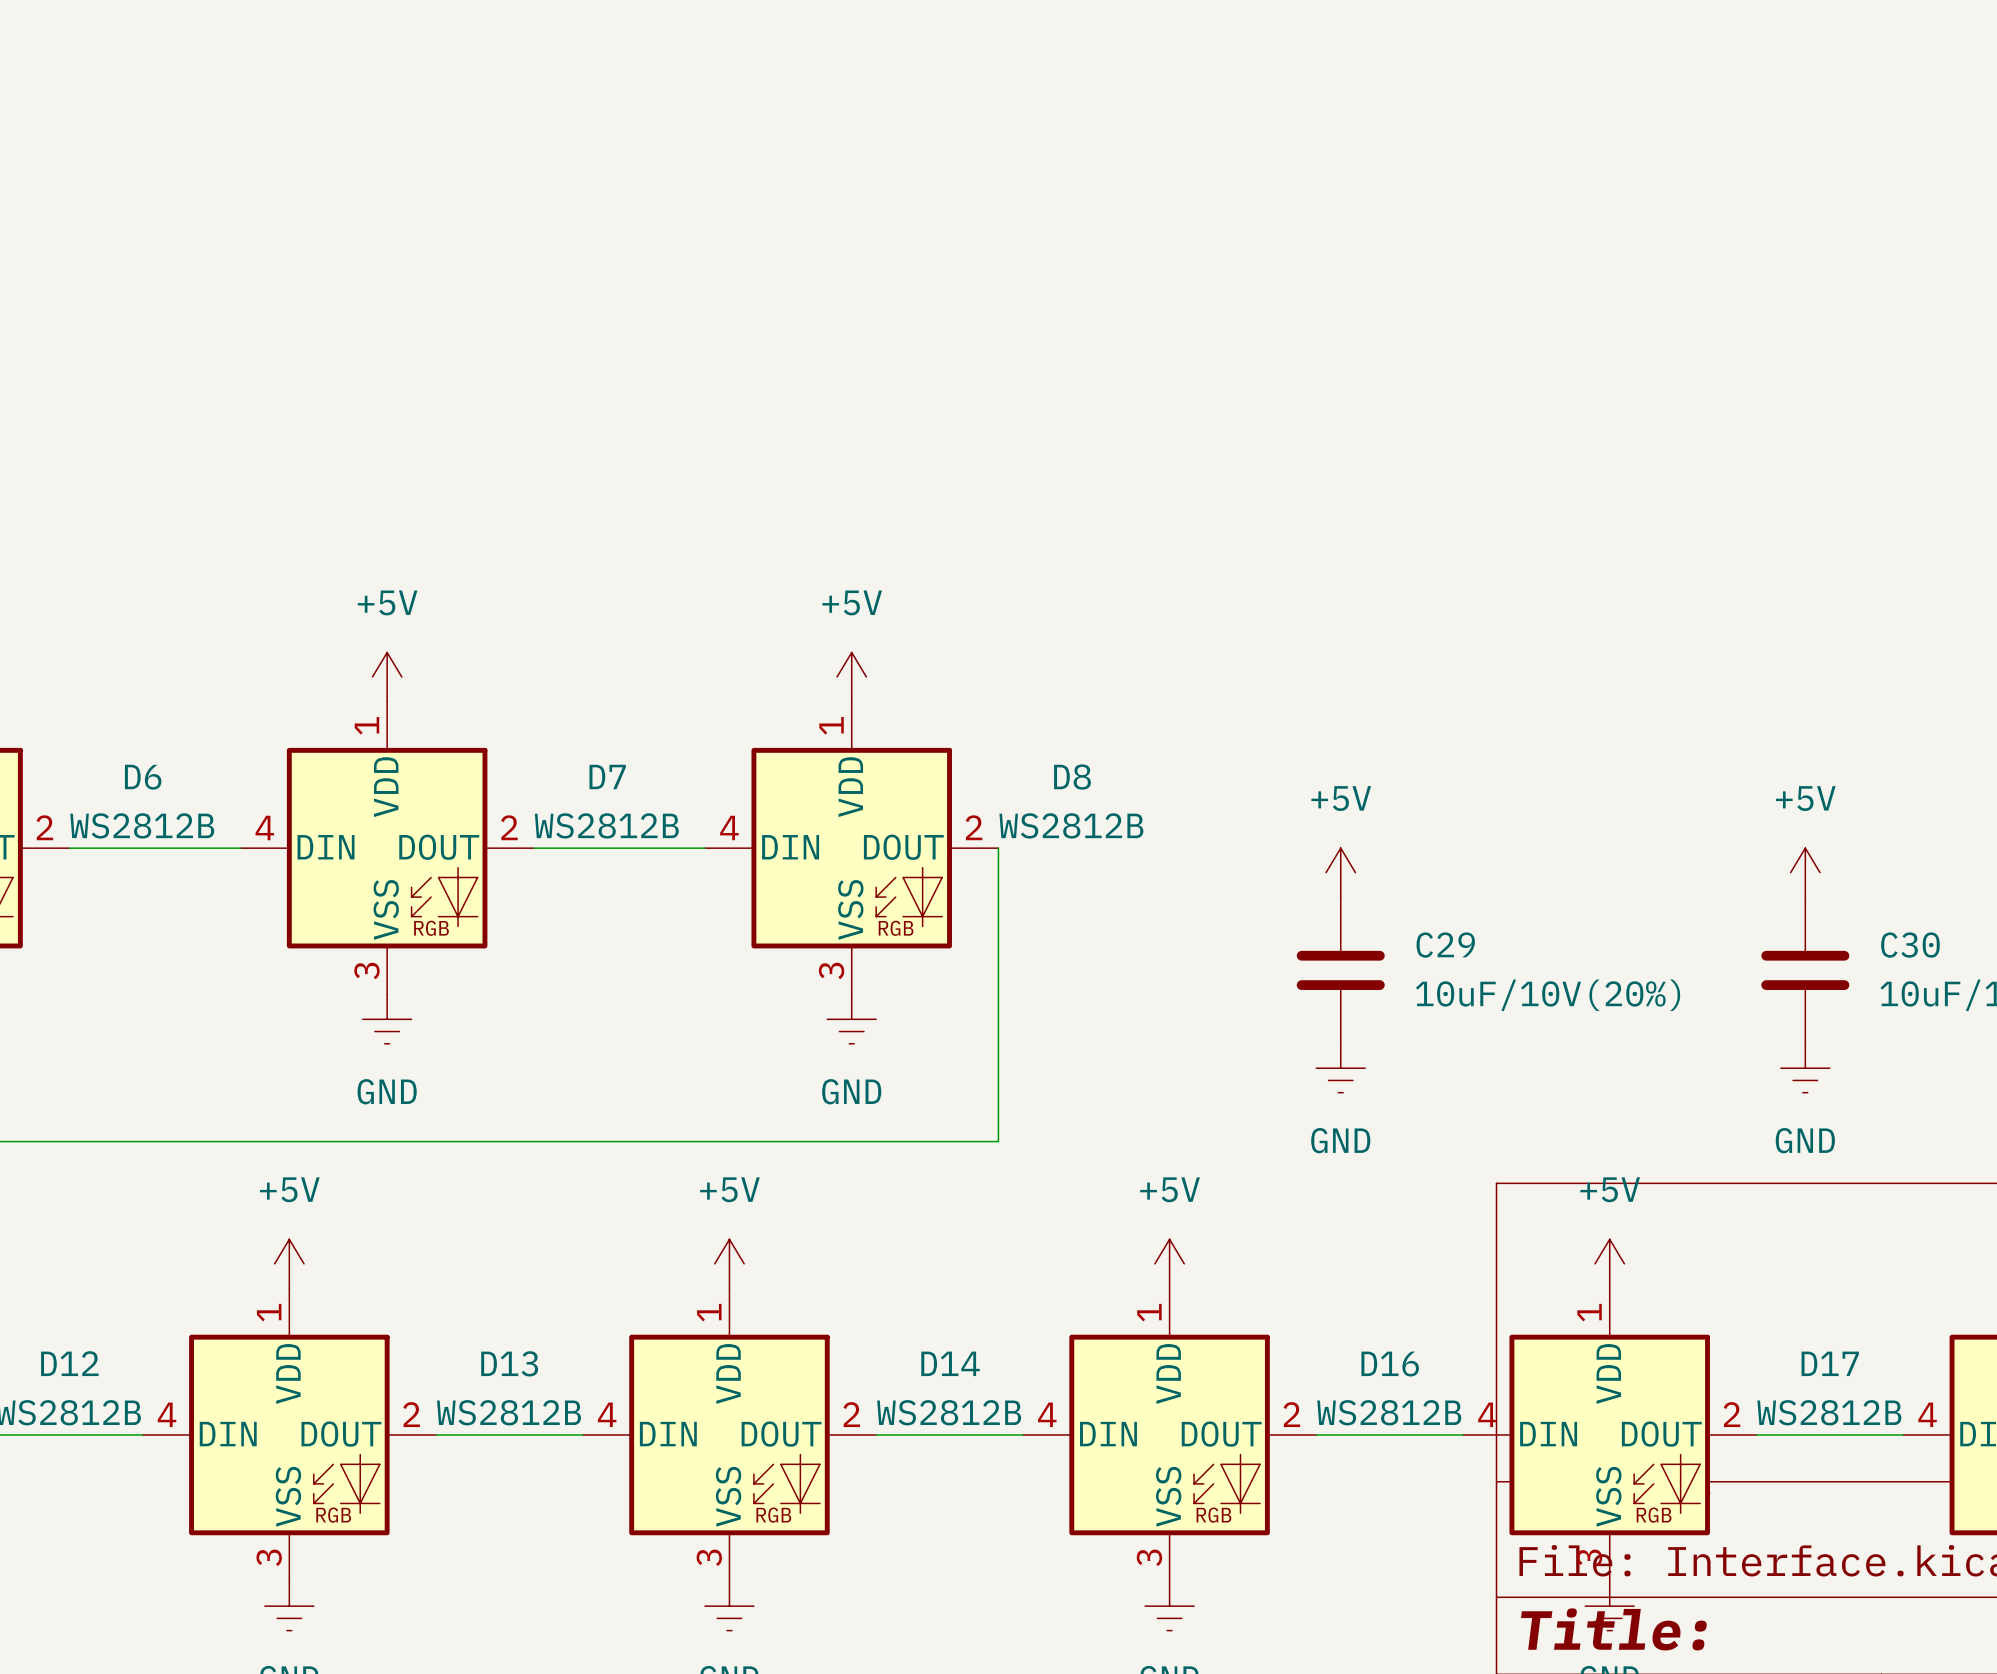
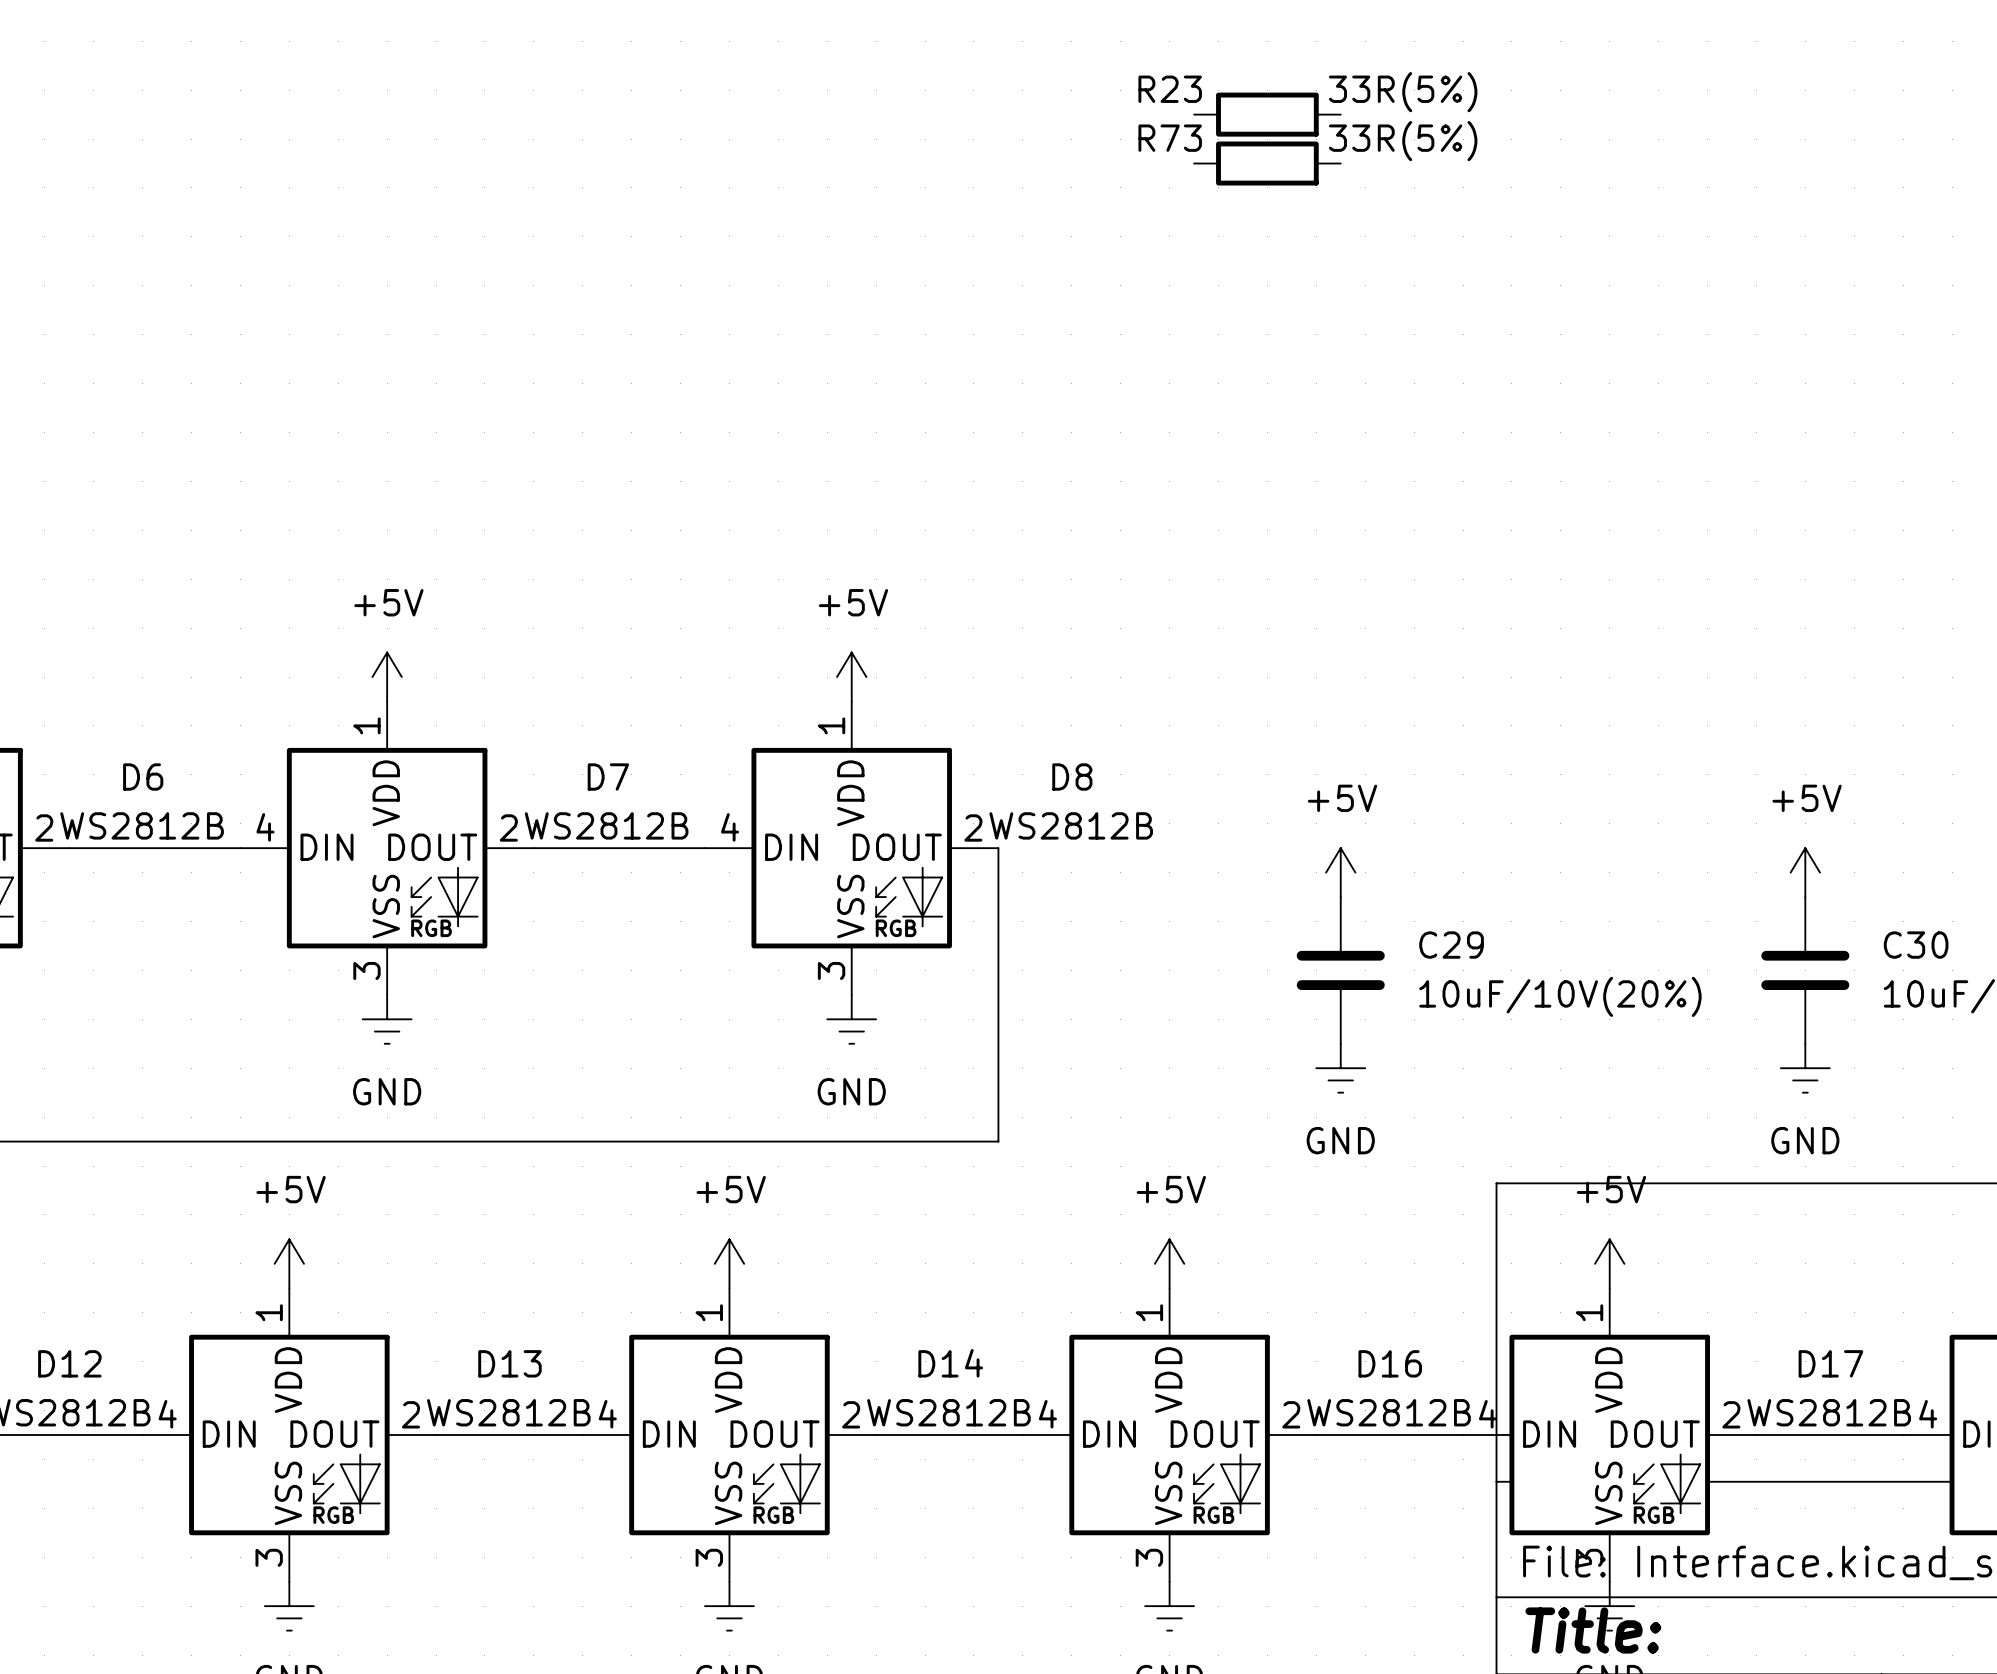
R23: none -> 33R(5%) (1267, 114)
R73: none -> 33R(5%) (1267, 163)

